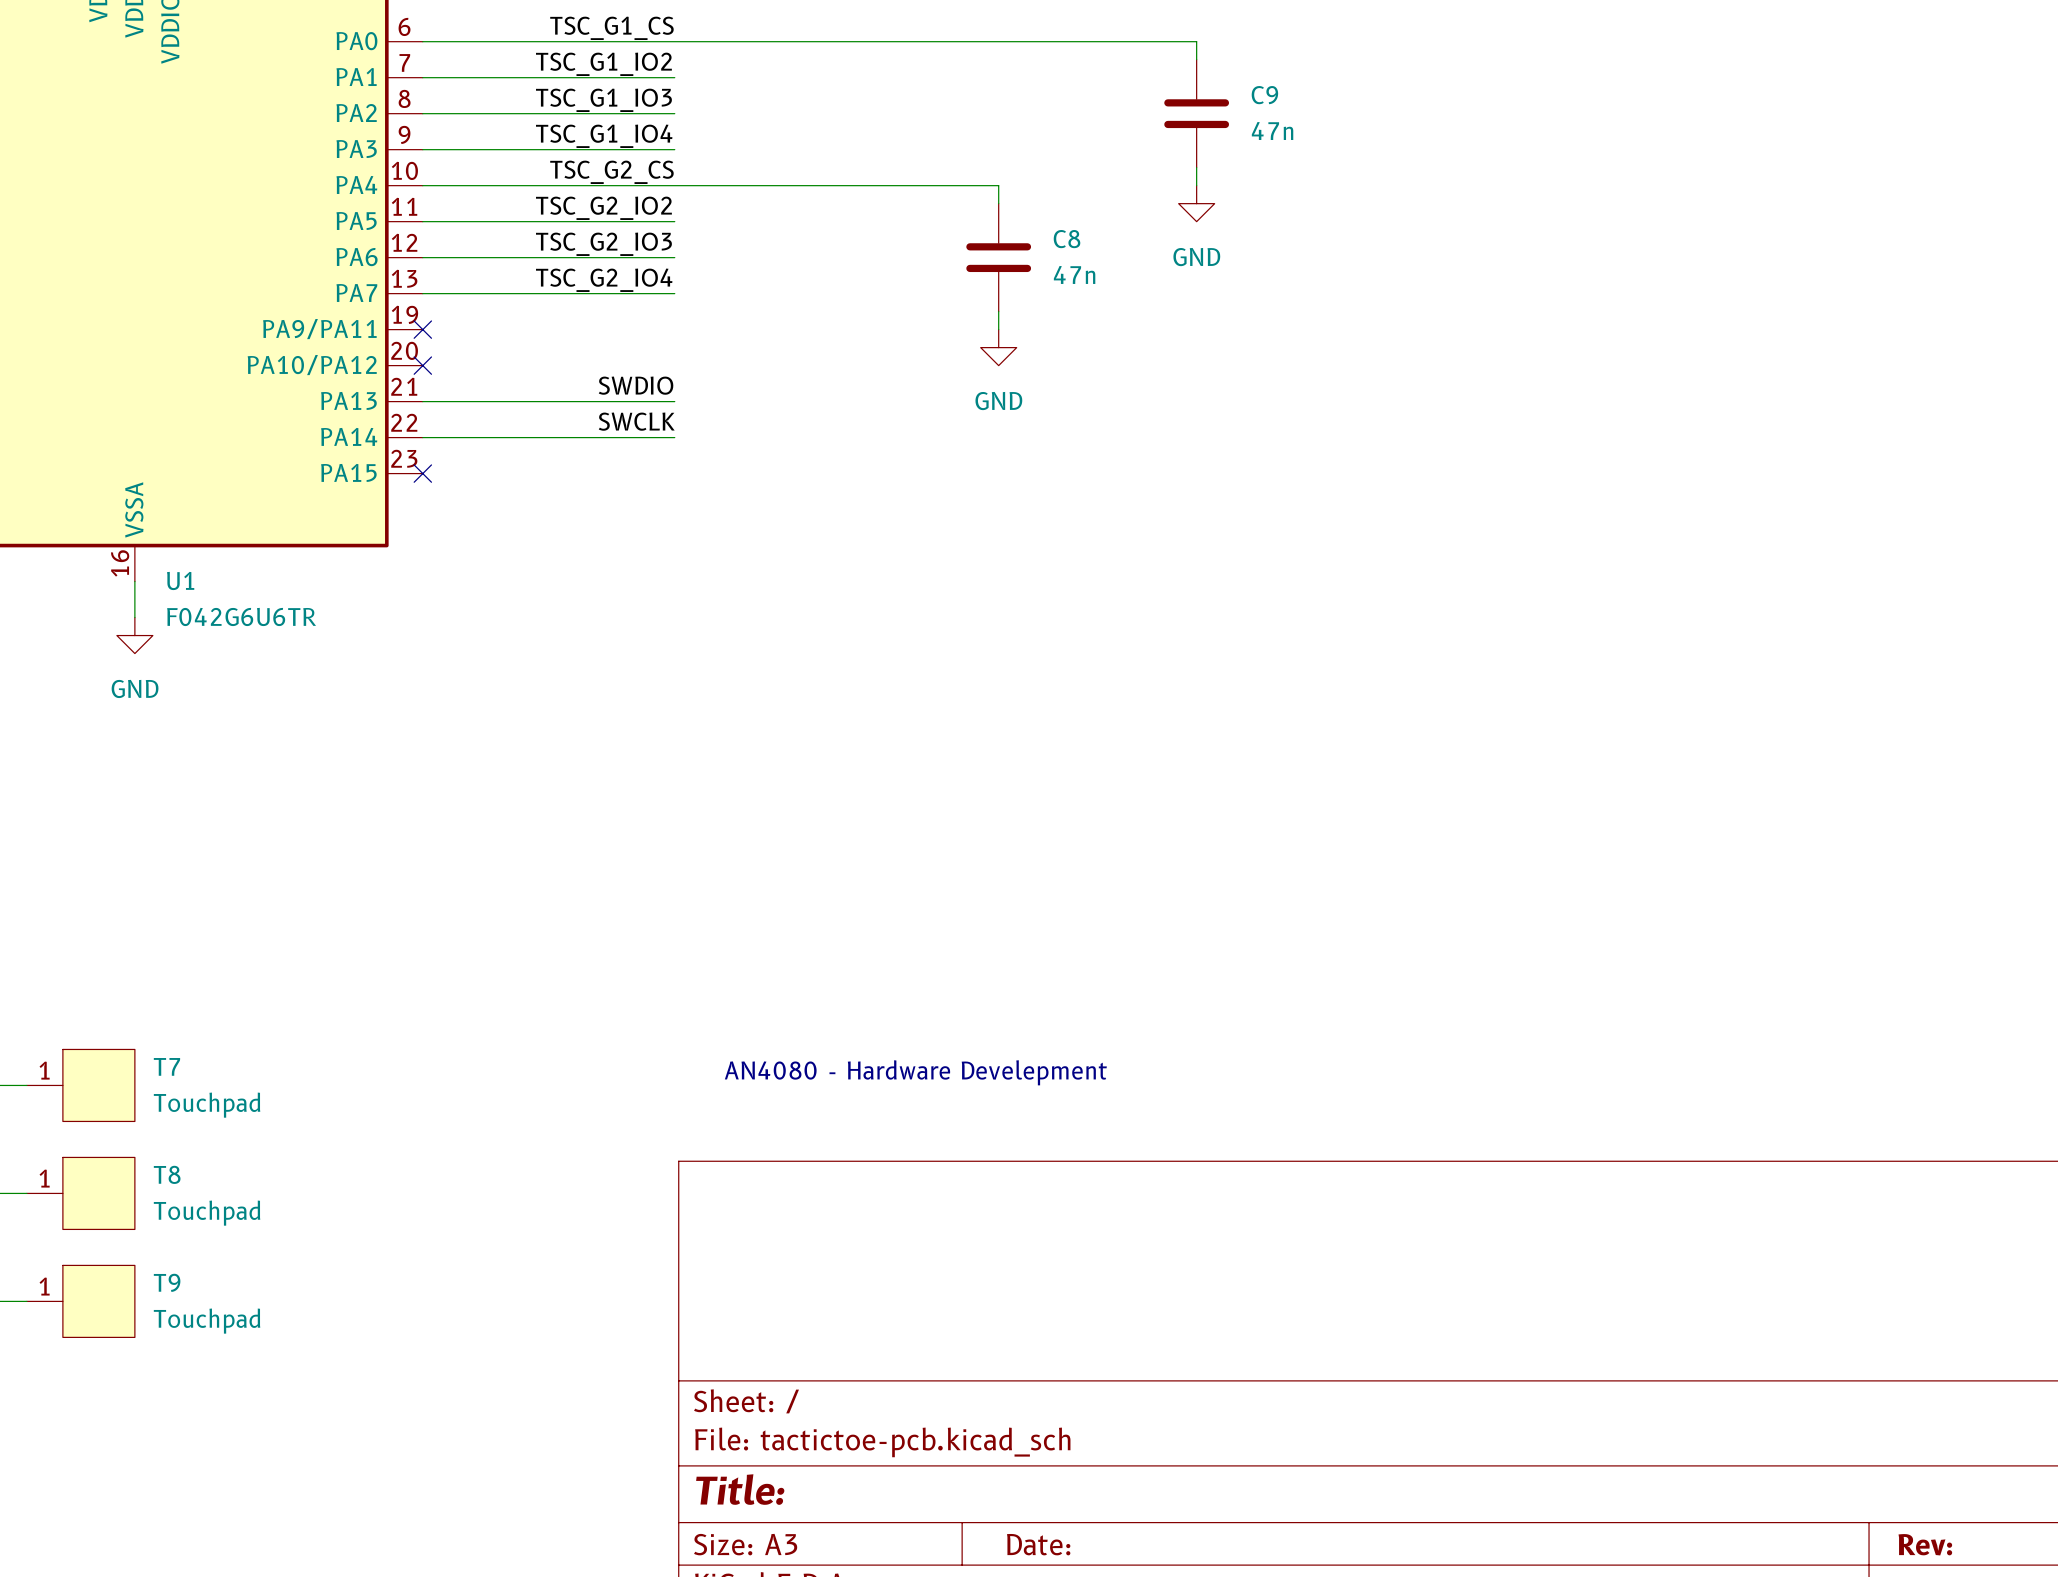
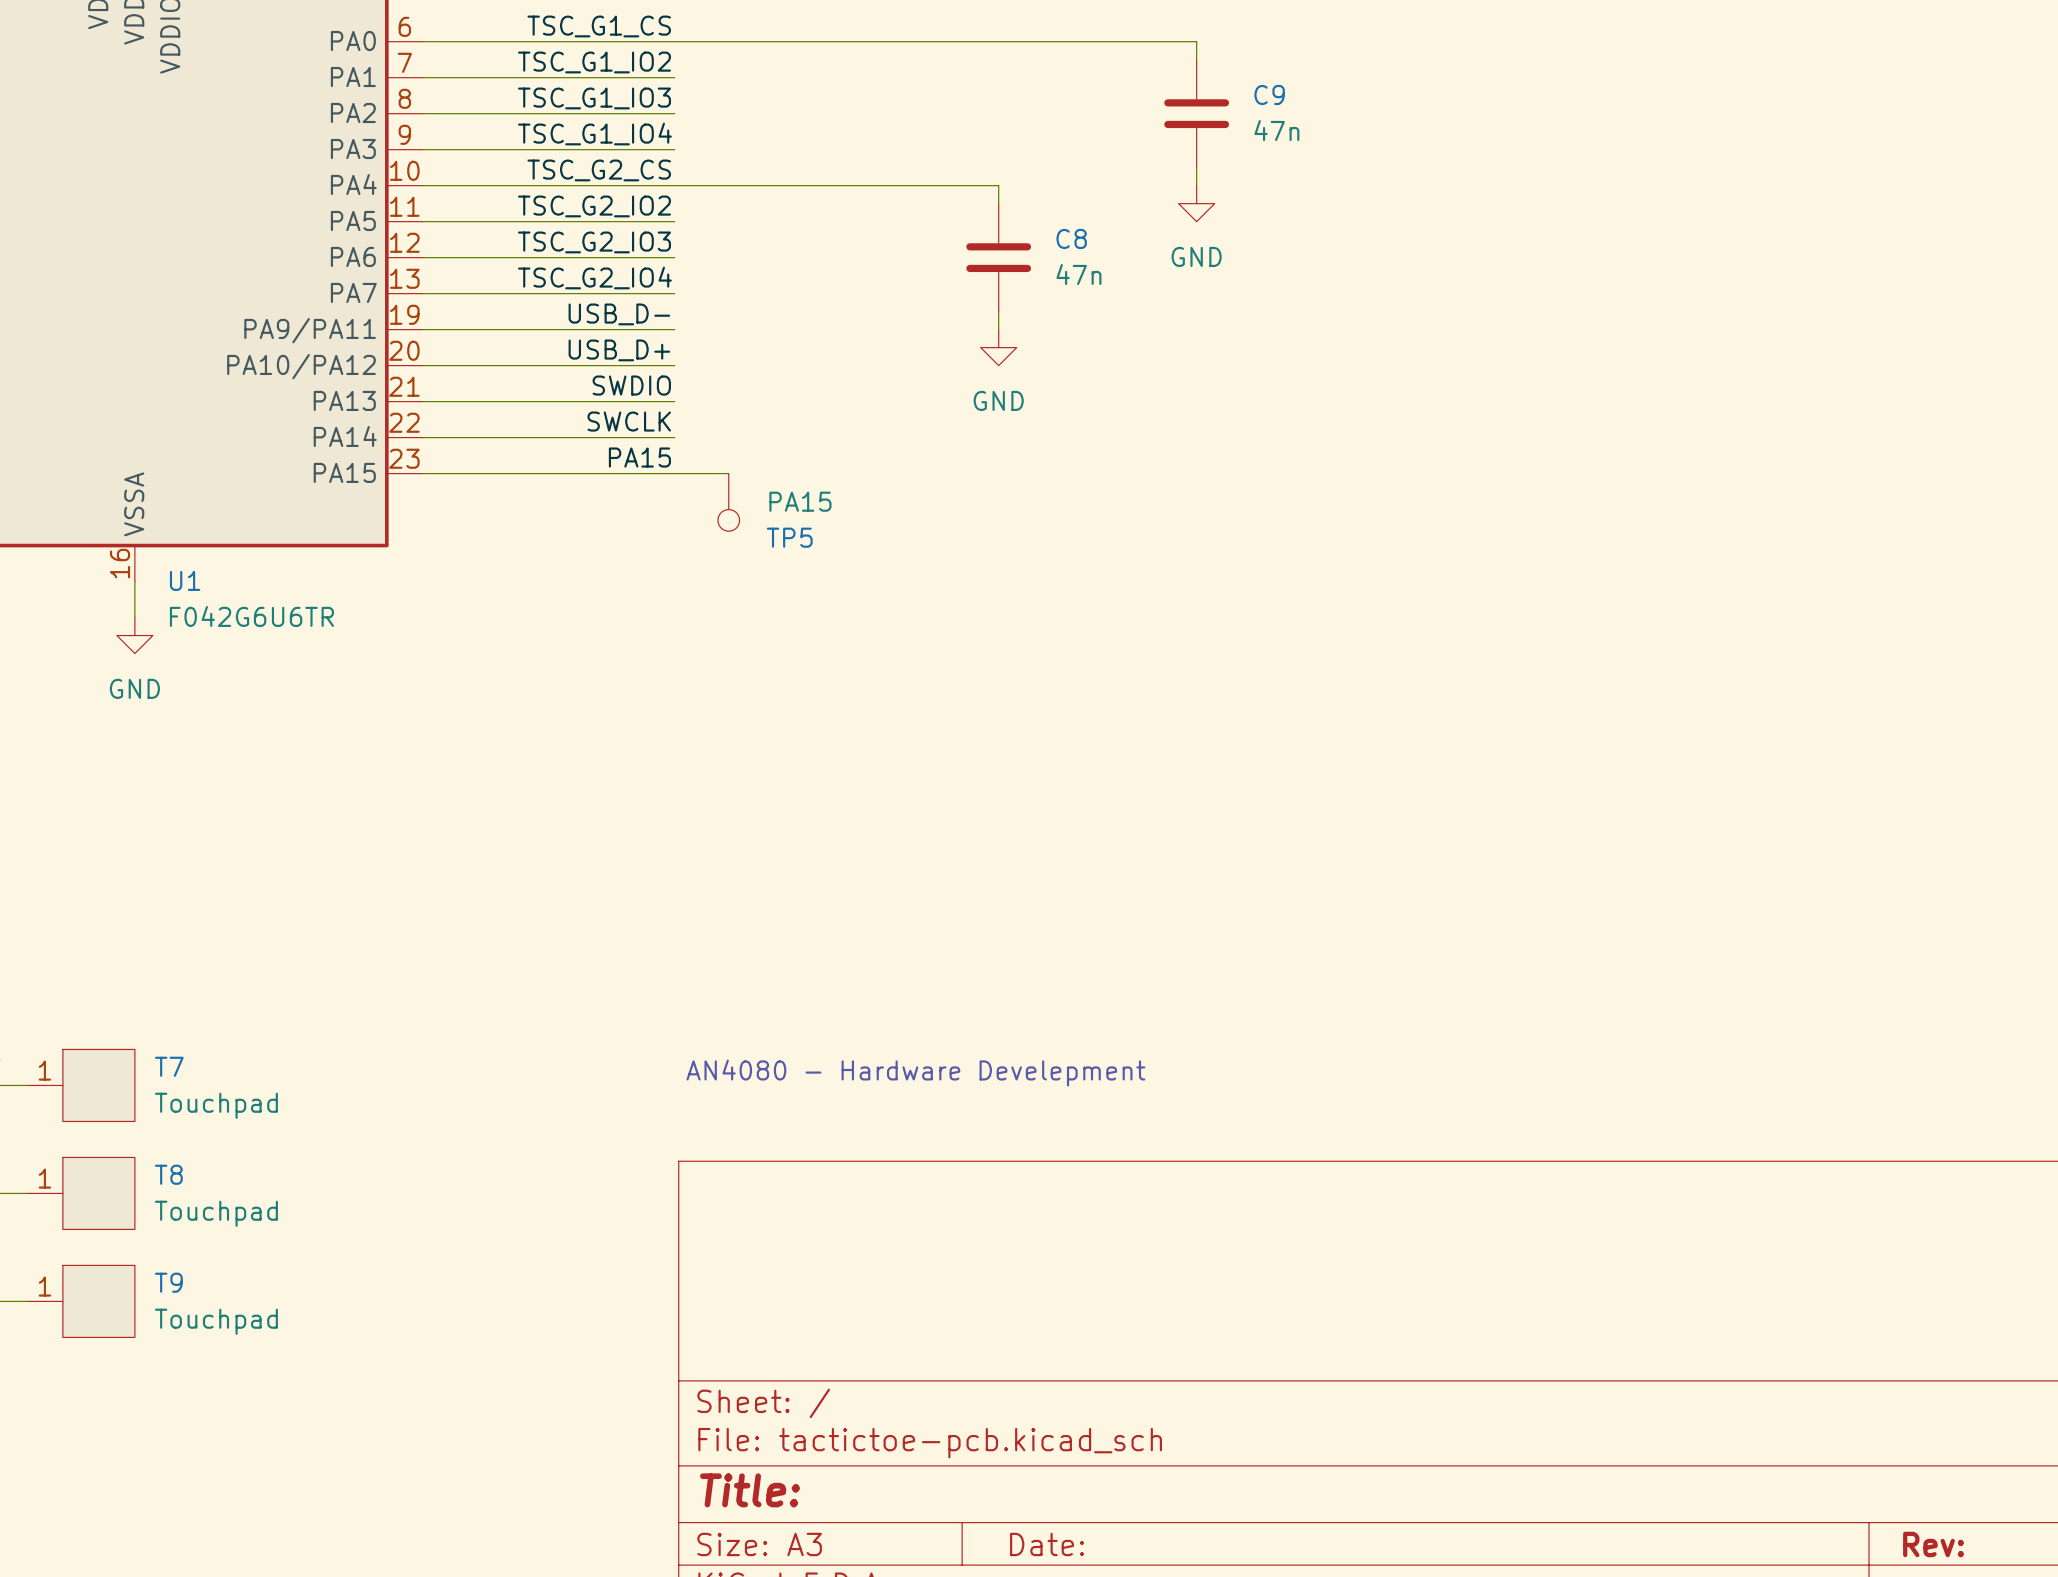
label: none -> USB_D- (619, 314)
wire: none -> (422, 329) (674, 329)
no-connect mark: (422, 329) -> none
label: none -> USB_D+ (619, 350)
wire: none -> (422, 365) (674, 365)
no-connect mark: (422, 365) -> none
label: none -> PA15 (639, 457)
wire: none -> (422, 473) (728, 473)
no-connect mark: (422, 473) -> none
TP5: none -> PA15 (728, 502)

